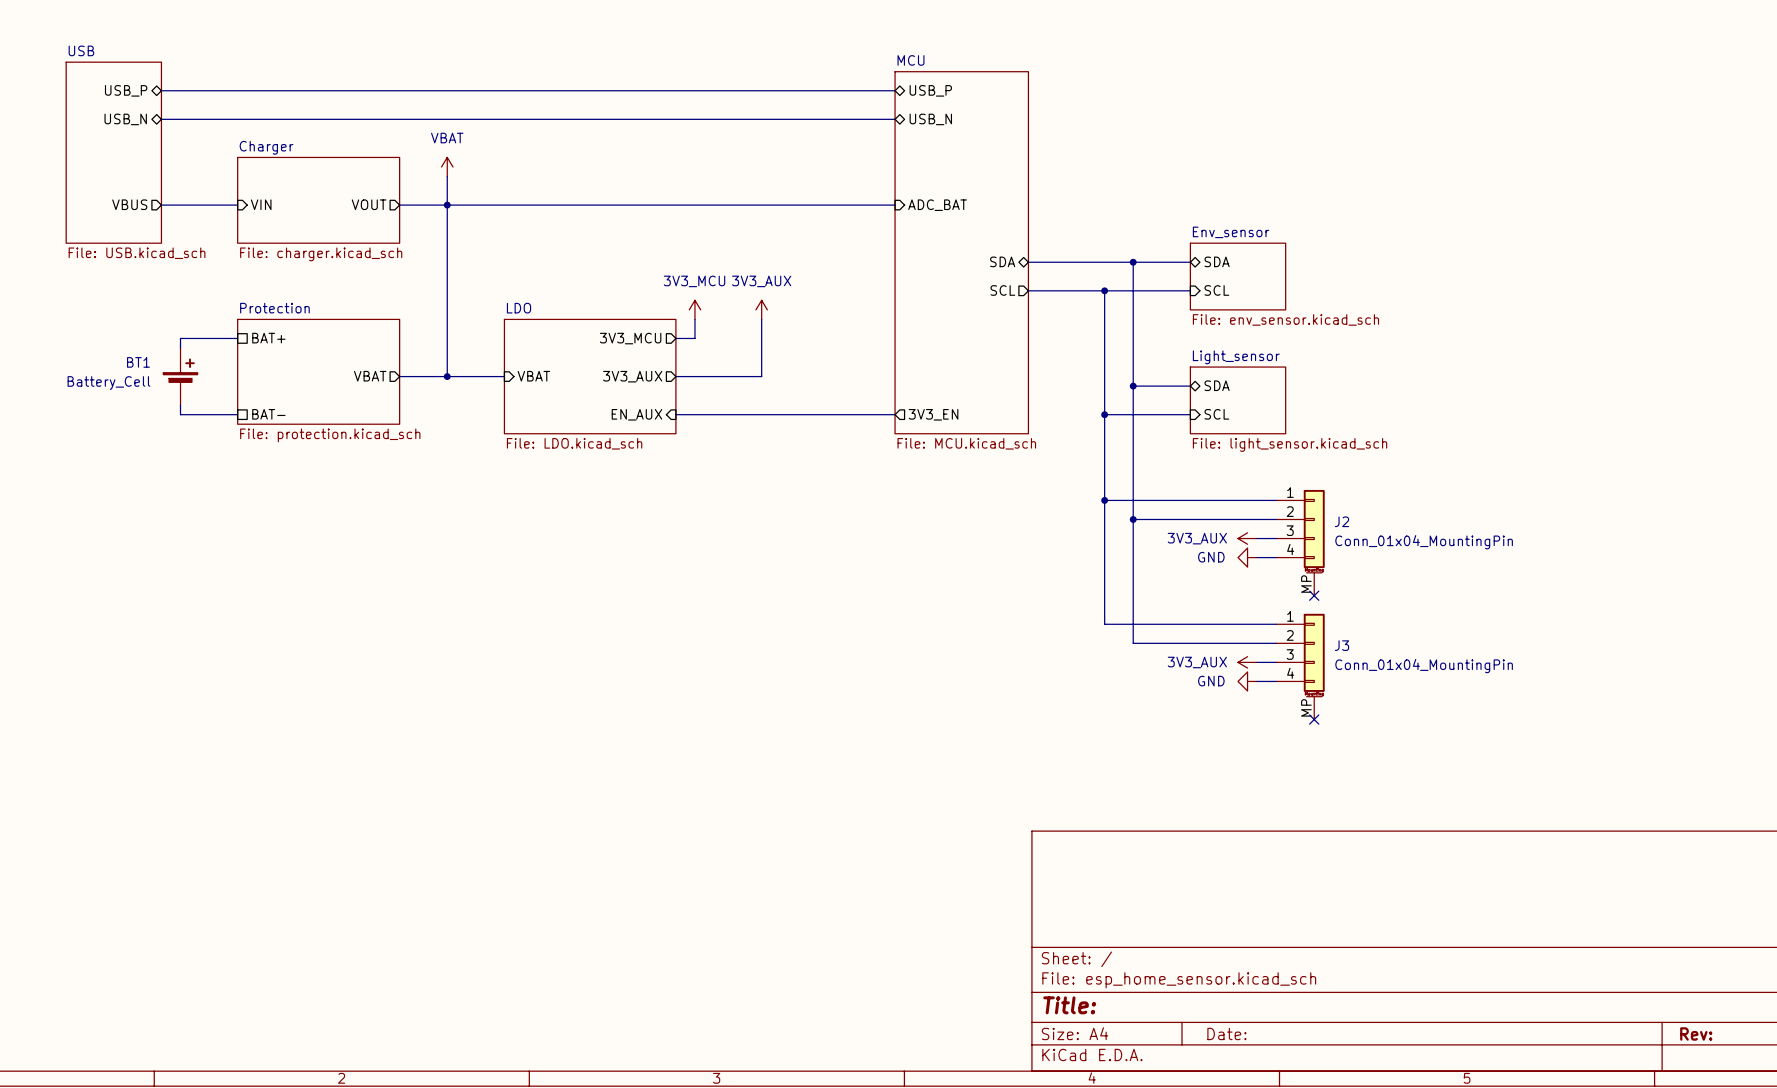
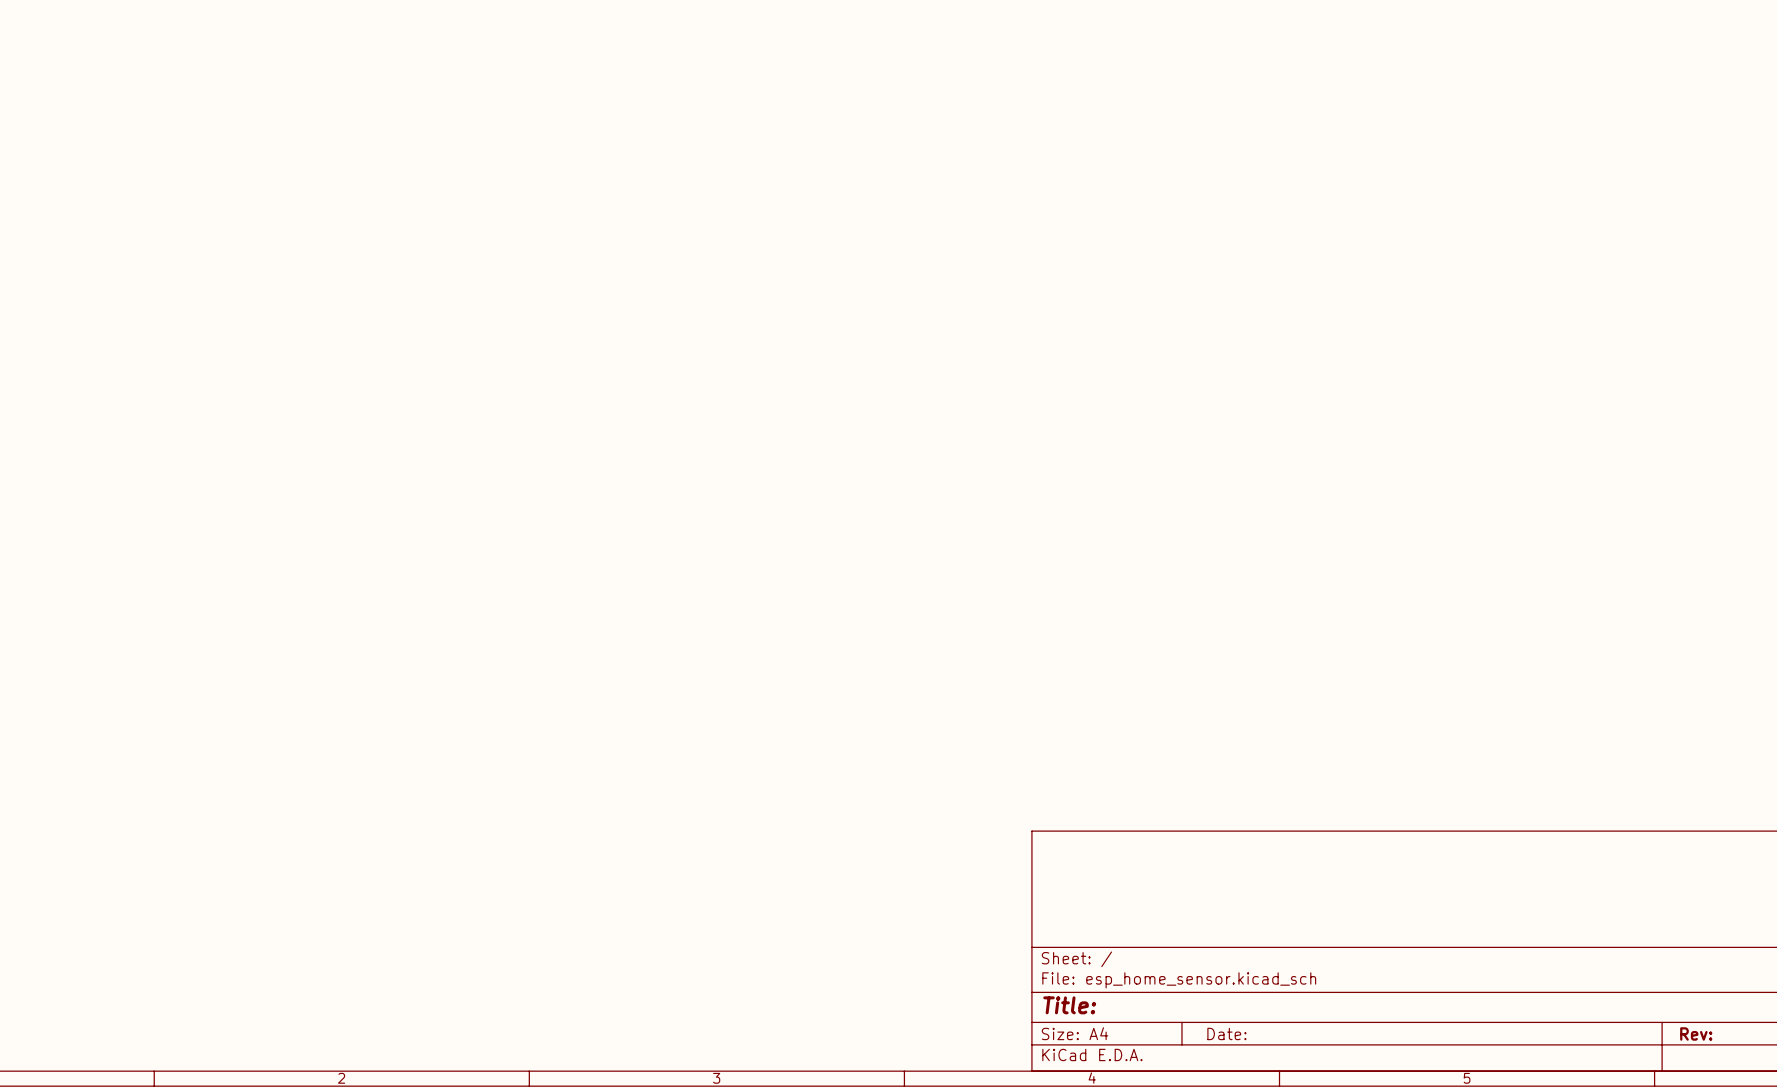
sheet pin: USB_P (126, 90) -> none
wire: (161, 90) (895, 90) -> none
sheet pin: USB_P (930, 90) -> none
sheet pin: USB_N (125, 119) -> none
wire: (161, 119) (895, 119) -> none
sheet pin: USB_N (930, 119) -> none
sheet USB: File: USB.kicad_sch (113, 152) -> none
power symbol: VBAT (447, 166) -> none
wire: (447, 176) (447, 376) -> none
sheet Charger: File: charger.kicad_sch (318, 200) -> none
sheet pin: VBUS (129, 204) -> none
sheet pin: VIN (261, 204) -> none
sheet pin: VOUT (369, 204) -> none
wire: (161, 205) (237, 205) -> none
wire: (399, 205) (895, 205) -> none
junction: (447, 205) -> none
sheet pin: ADC_BAT (937, 205) -> none
sheet MCU: File: MCU.kicad_sch (961, 252) -> none
sheet pin: SDA (1002, 261) -> none
sheet pin: SDA (1217, 261) -> none
wire: (1028, 262) (1190, 262) -> none
wire: (1133, 262) (1133, 643) (1276, 643) -> none
junction: (1133, 262) -> none
sheet Env_sensor: File: env_sensor.kicad_sch (1238, 276) -> none
sheet pin: SCL (1002, 290) -> none
wire: (1028, 290) (1190, 290) -> none
wire: (1104, 290) (1104, 624) (1276, 624) -> none
junction: (1104, 290) -> none
sheet pin: SCL (1216, 290) -> none
power symbol: 3V3_MCU (694, 309) -> none
power symbol: 3V3_AUX (761, 309) -> none
wire: (694, 319) (694, 338) (675, 338) -> none
wire: (761, 319) (761, 376) (675, 376) -> none
wire: (237, 338) (180, 338) (180, 347) -> none
sheet pin: BAT+ (268, 338) -> none
sheet pin: 3V3_MCU (630, 338) -> none
sheet Protection: File: protection.kicad_sch (318, 371) -> none
BT1: Battery_Cell (180, 376) -> none
sheet pin: VBAT (370, 376) -> none
wire: (399, 376) (504, 376) -> none
junction: (447, 376) -> none
sheet pin: VBAT (533, 376) -> none
sheet LDO: File: LDO.kicad_sch (590, 376) -> none
sheet pin: 3V3_AUX (632, 376) -> none
sheet pin: SDA (1217, 385) -> none
wire: (1133, 386) (1190, 386) -> none
junction: (1133, 386) -> none
sheet Light_sensor: File: light_sensor.kicad_sch (1238, 400) -> none
wire: (180, 405) (180, 414) (237, 414) -> none
sheet pin: BAT- (268, 414) -> none
sheet pin: EN_AUX (636, 414) -> none
wire: (675, 414) (895, 414) -> none
sheet pin: 3V3_EN (933, 414) -> none
wire: (1104, 414) (1190, 414) -> none
junction: (1104, 414) -> none
sheet pin: SCL (1216, 414) -> none
wire: (1104, 500) (1276, 500) -> none
junction: (1104, 500) -> none
wire: (1133, 519) (1276, 519) -> none
junction: (1133, 519) -> none
power symbol: 3V3_AUX (1247, 538) -> none
wire: (1257, 538) (1276, 538) -> none
J2: Conn_01x04_MountingPin (1300, 542) -> none
power symbol: GND (1247, 557) -> none
wire: (1257, 557) (1276, 557) -> none
no-connect mark: (1314, 595) -> none
power symbol: 3V3_AUX (1247, 662) -> none
wire: (1257, 662) (1276, 662) -> none
J3: Conn_01x04_MountingPin (1300, 666) -> none
power symbol: GND (1247, 681) -> none
wire: (1257, 681) (1276, 681) -> none
no-connect mark: (1314, 719) -> none

